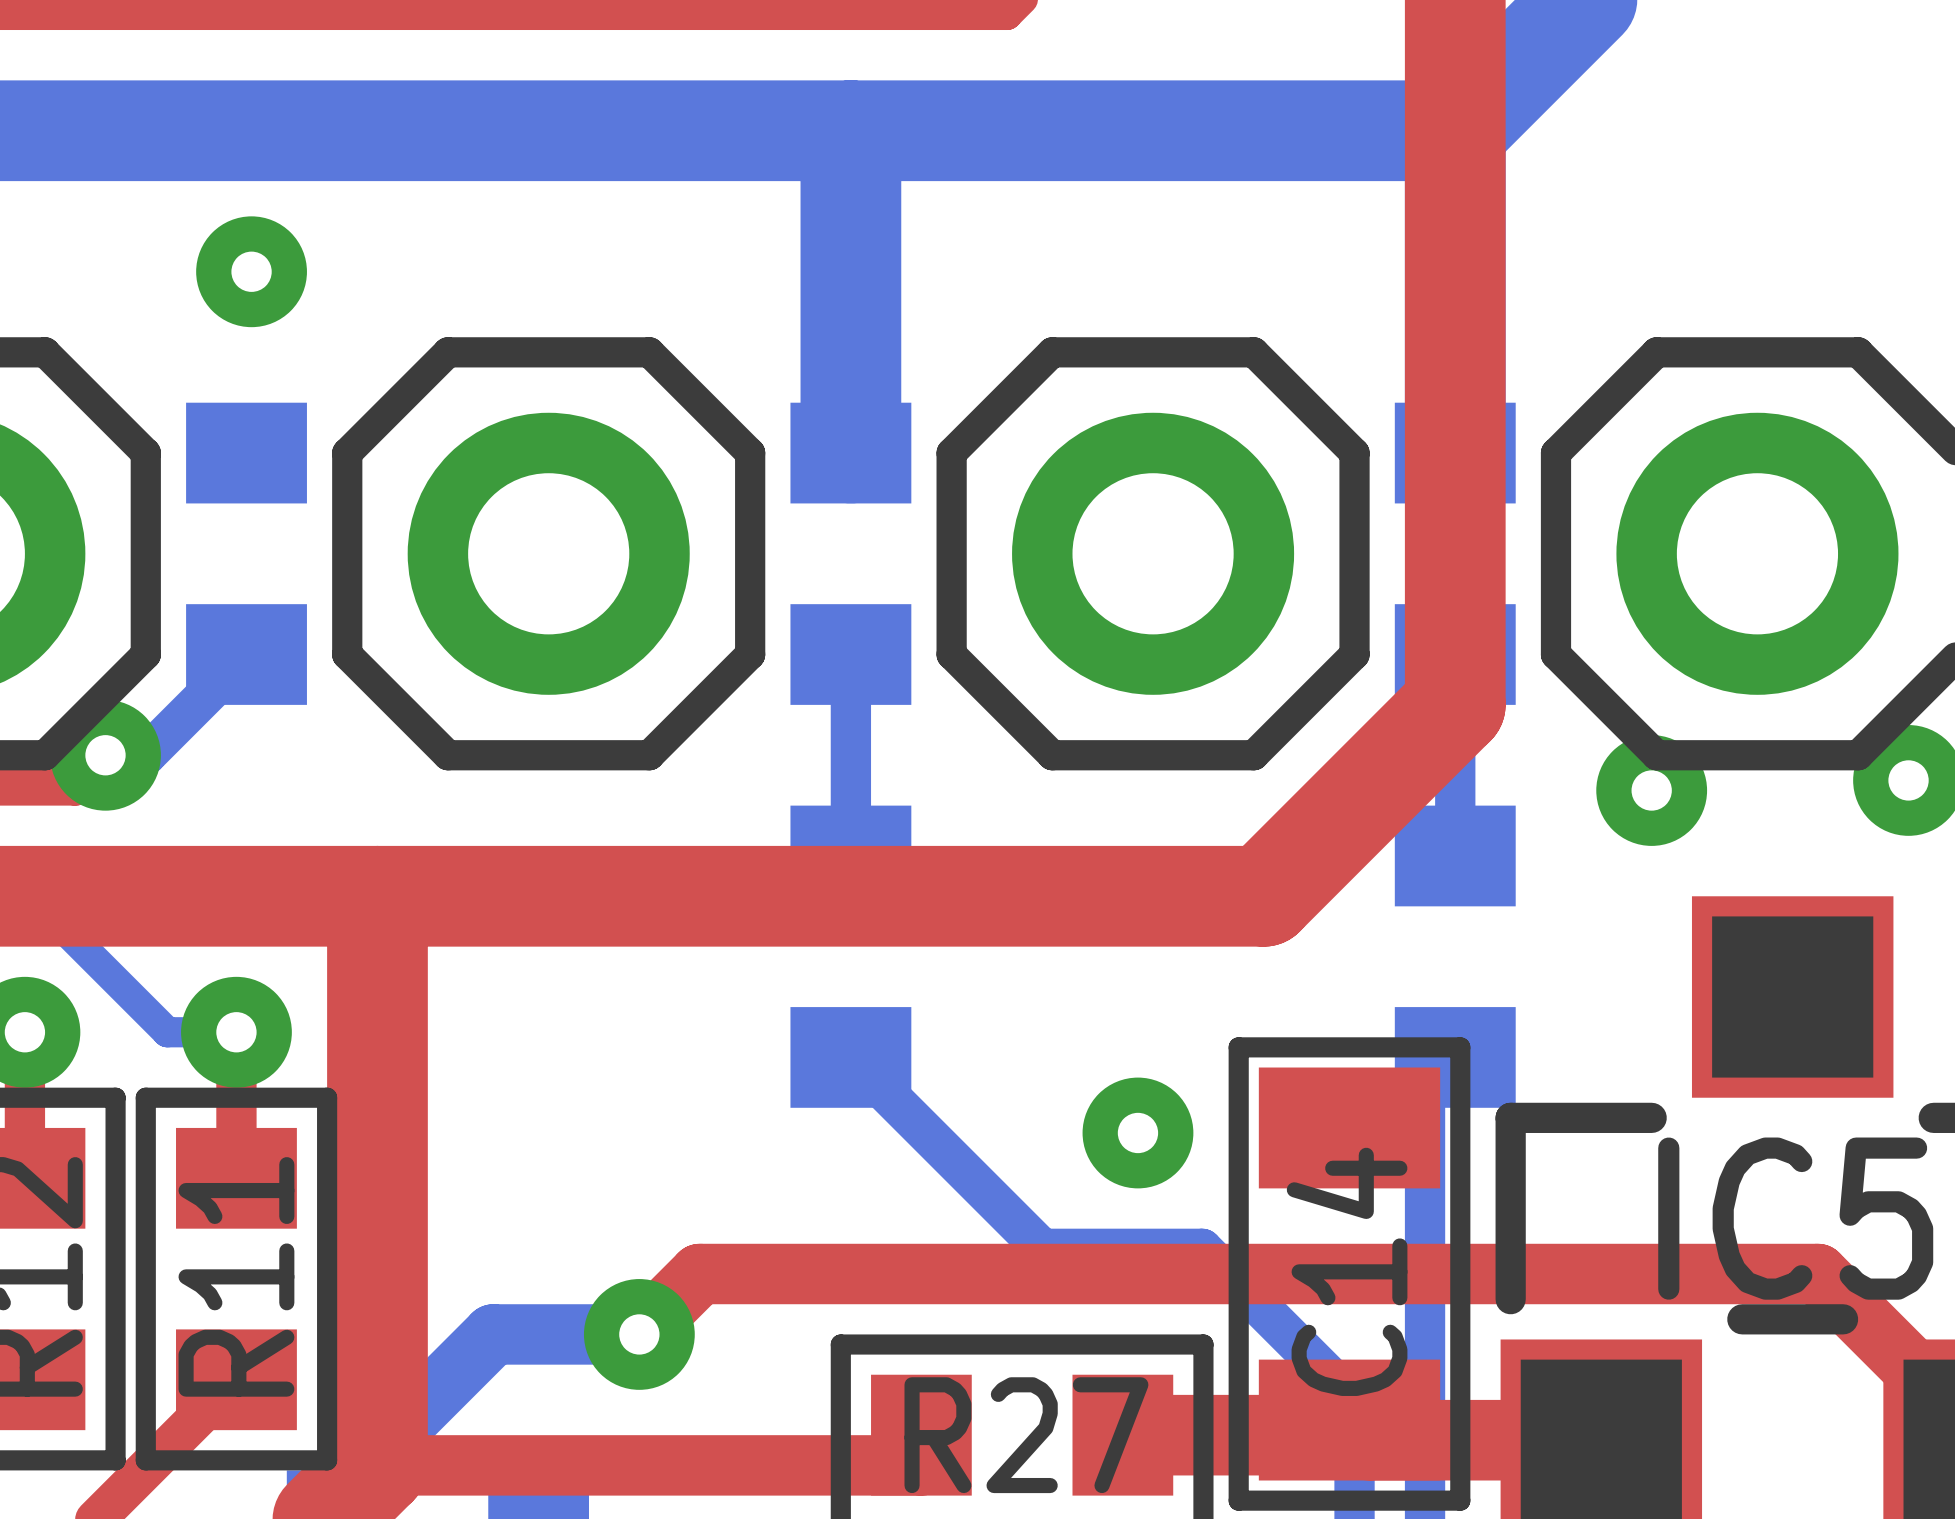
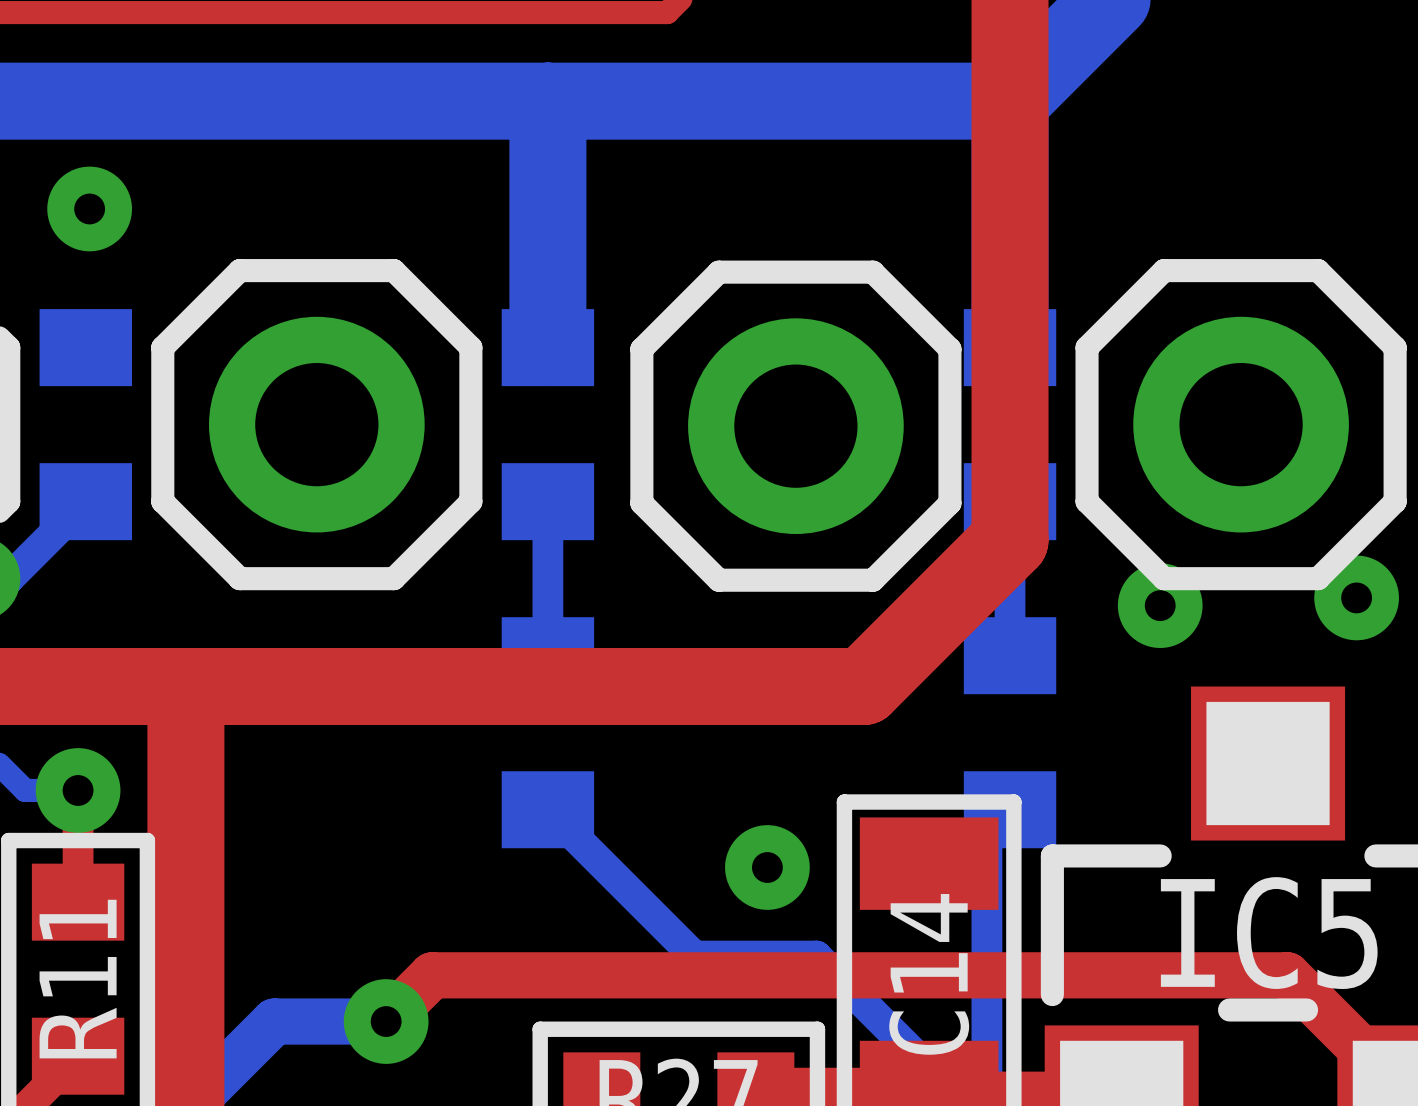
part position: (1153, 553) -> (795, 426)

